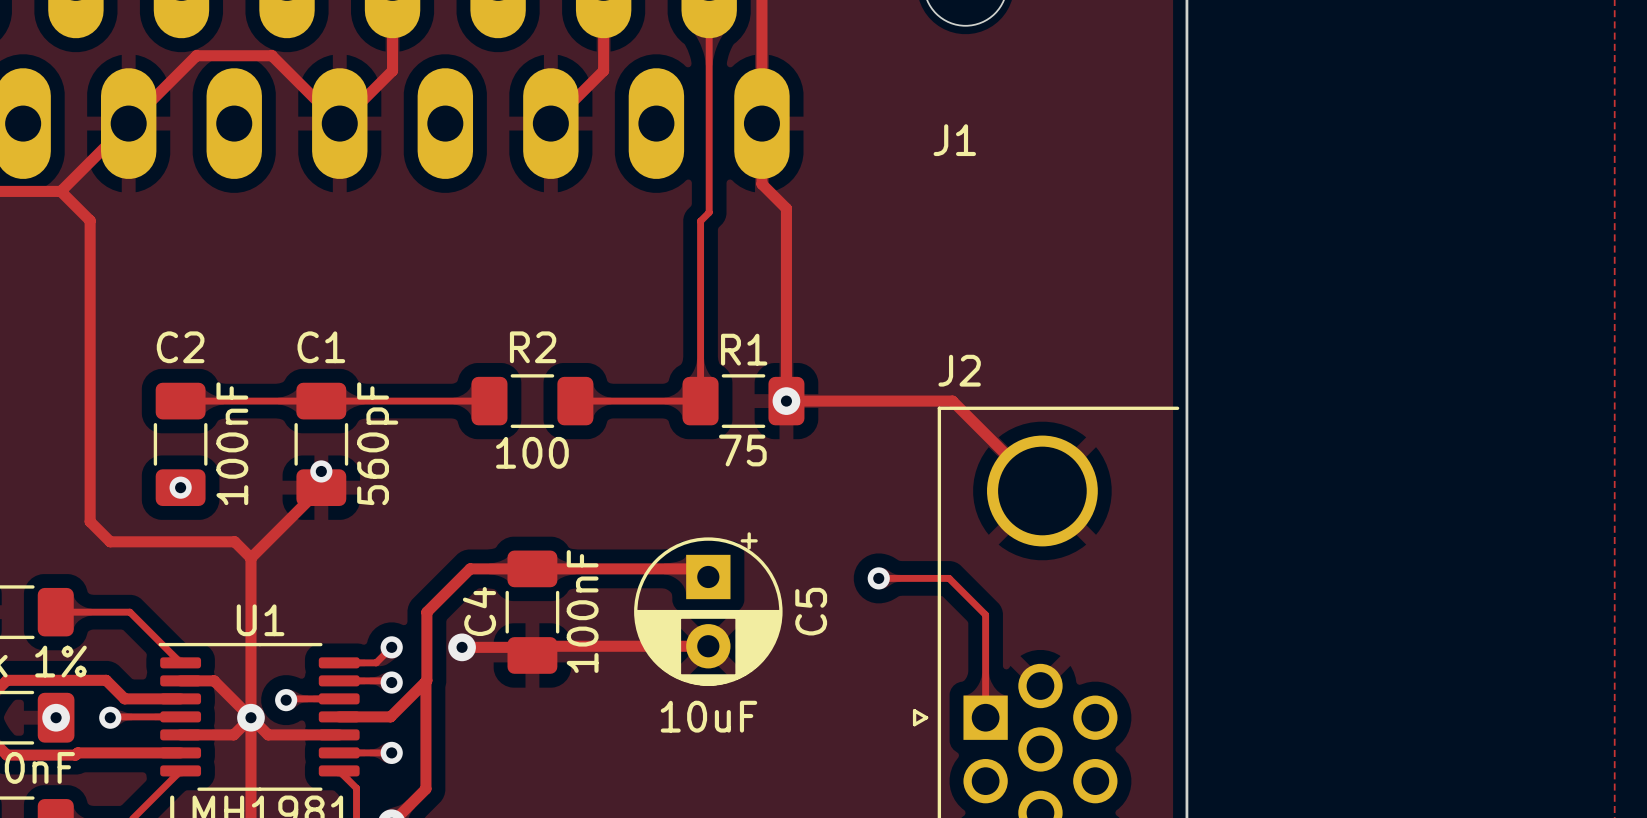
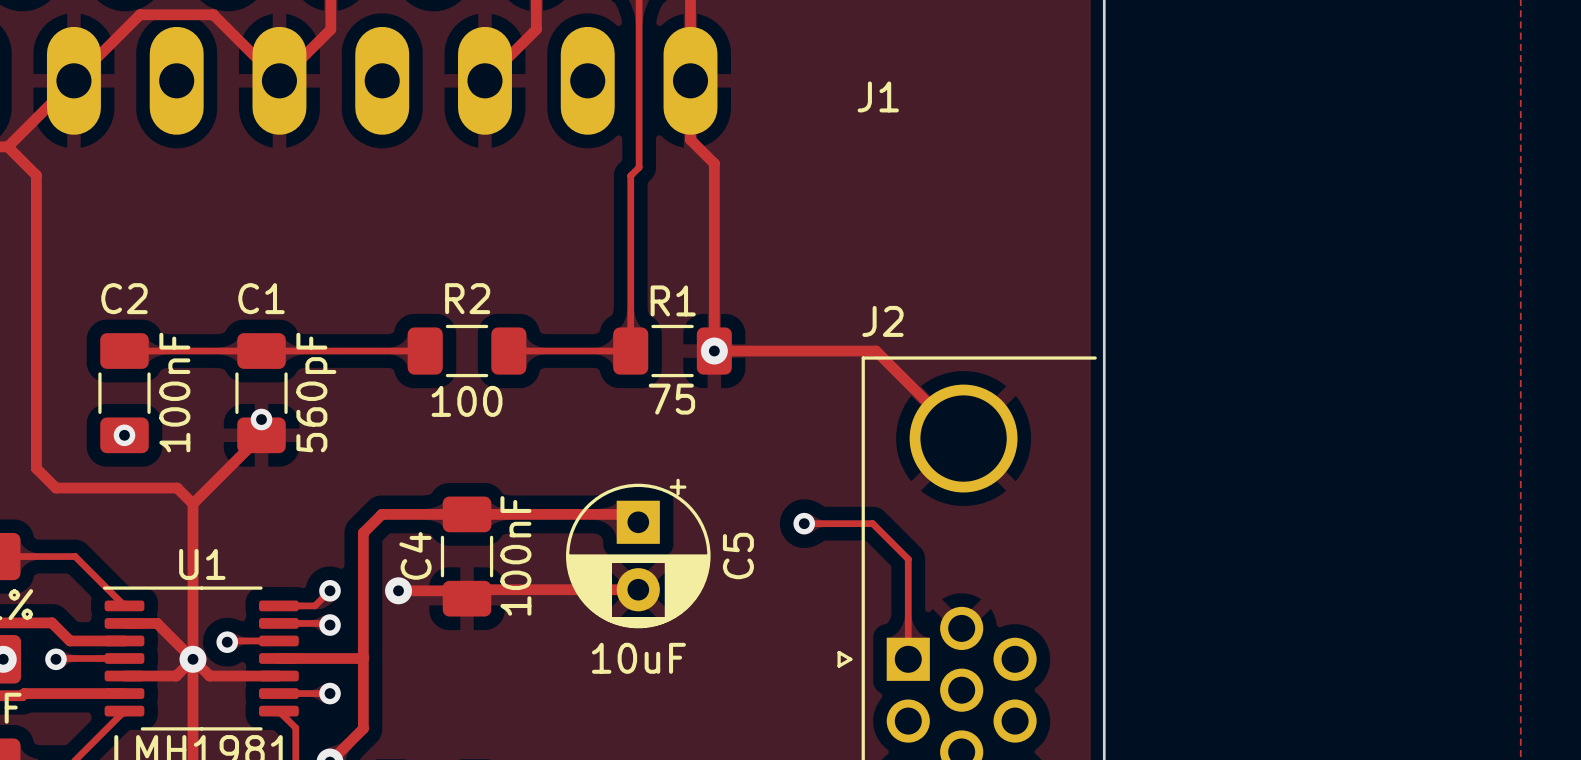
track: (470, 568) (426, 612) (426, 680) (390, 716) -> (406, 514) (381, 514) (363, 532) (363, 624)
track: none -> (363, 657) (328, 658)

